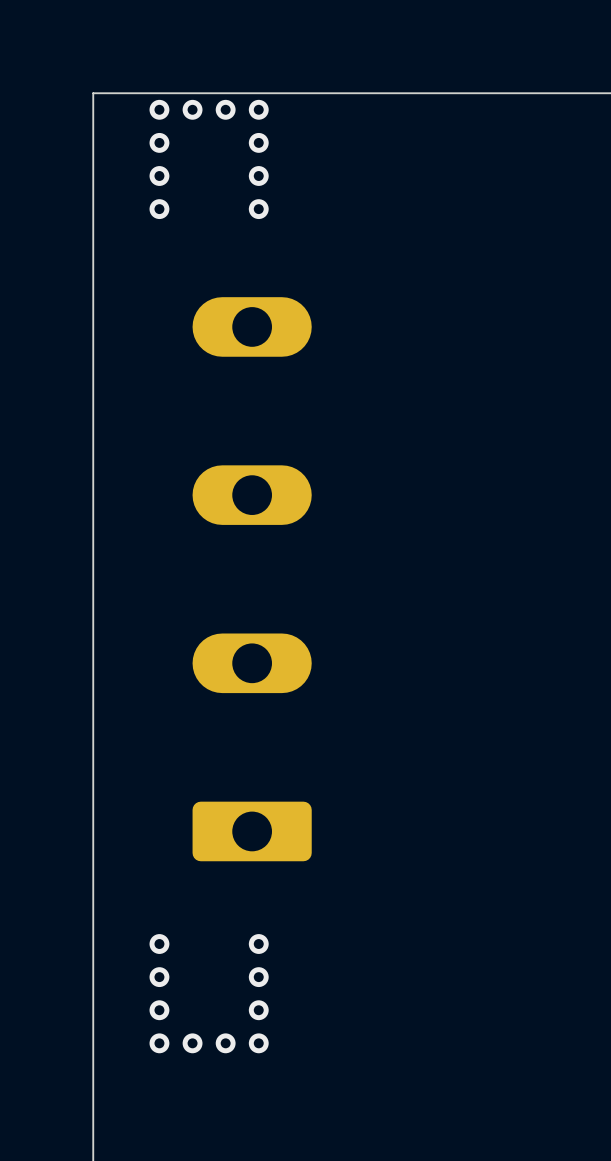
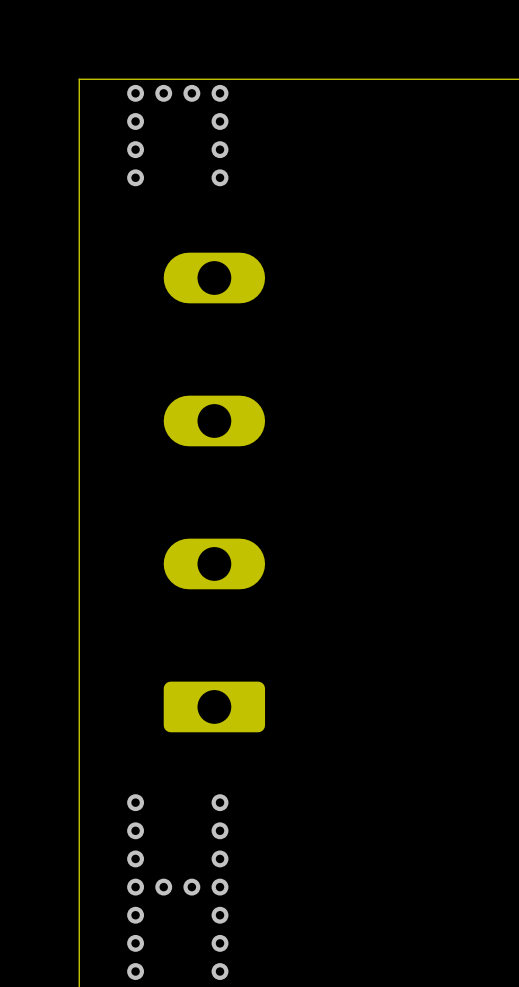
via: none -> (135, 915)
via: none -> (220, 915)
via: none -> (135, 943)
via: none -> (220, 943)
via: none -> (135, 971)
via: none -> (220, 971)

